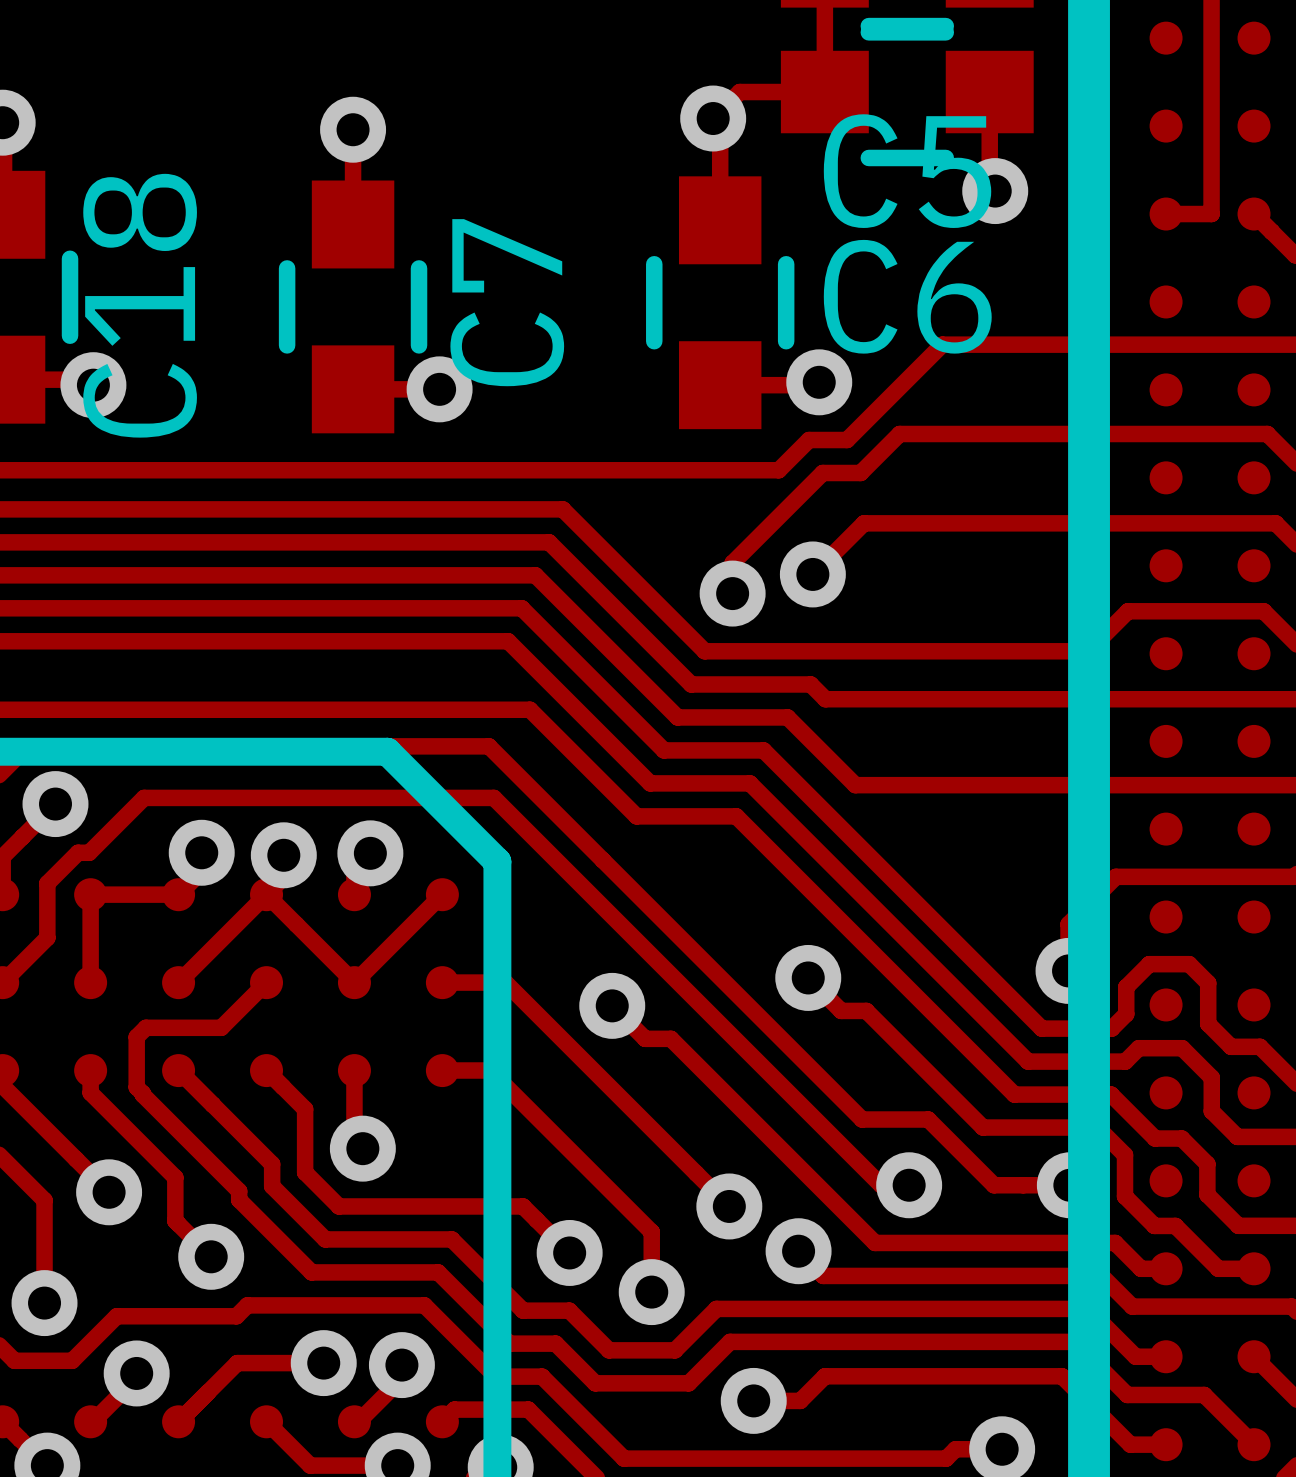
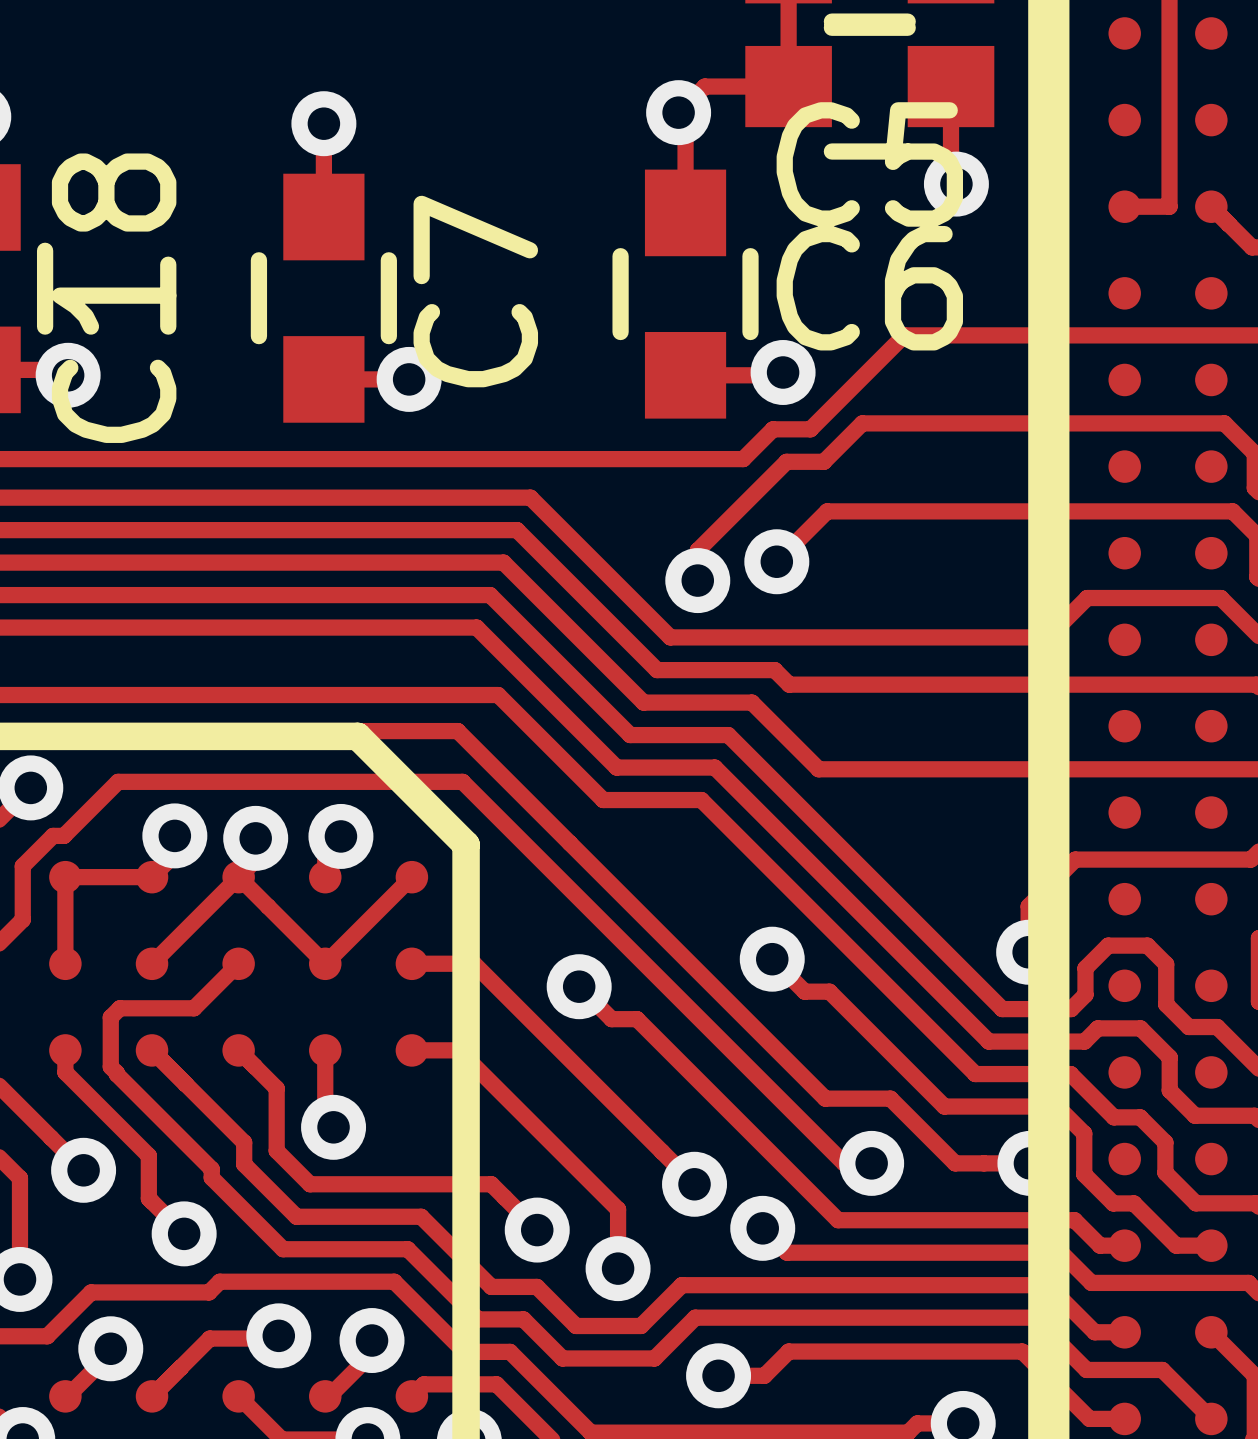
via position: (323, 1363) -> (278, 1335)

